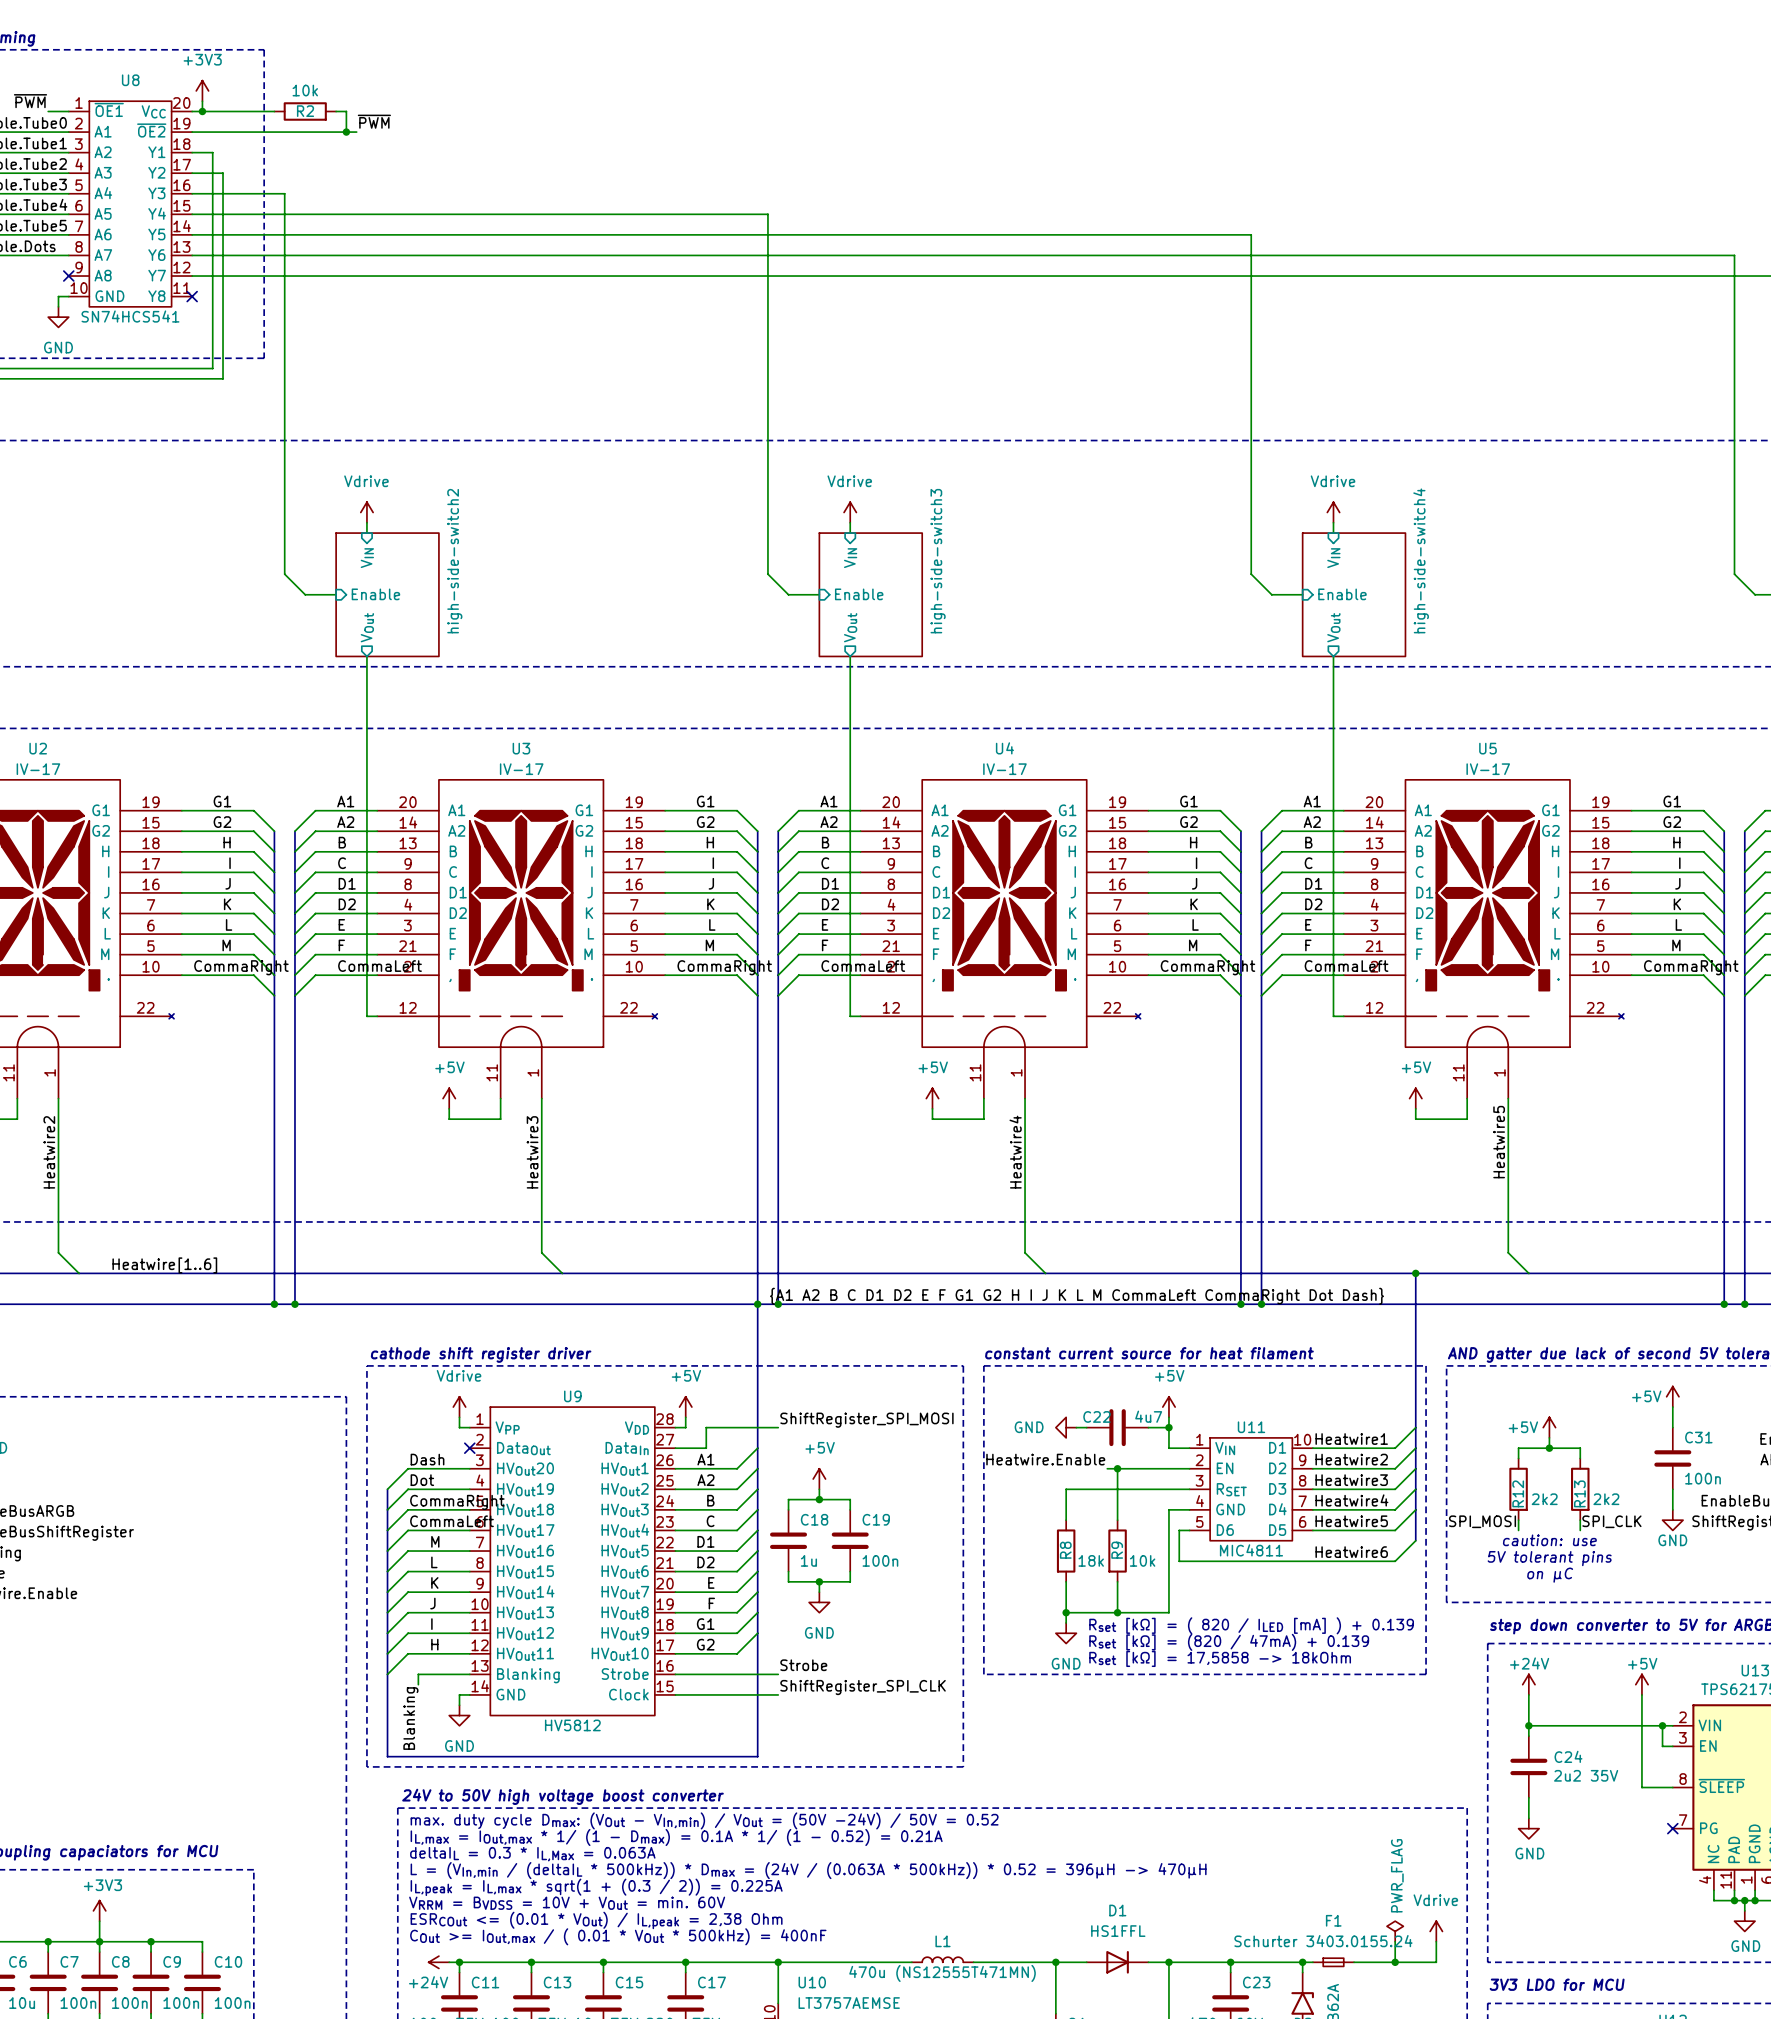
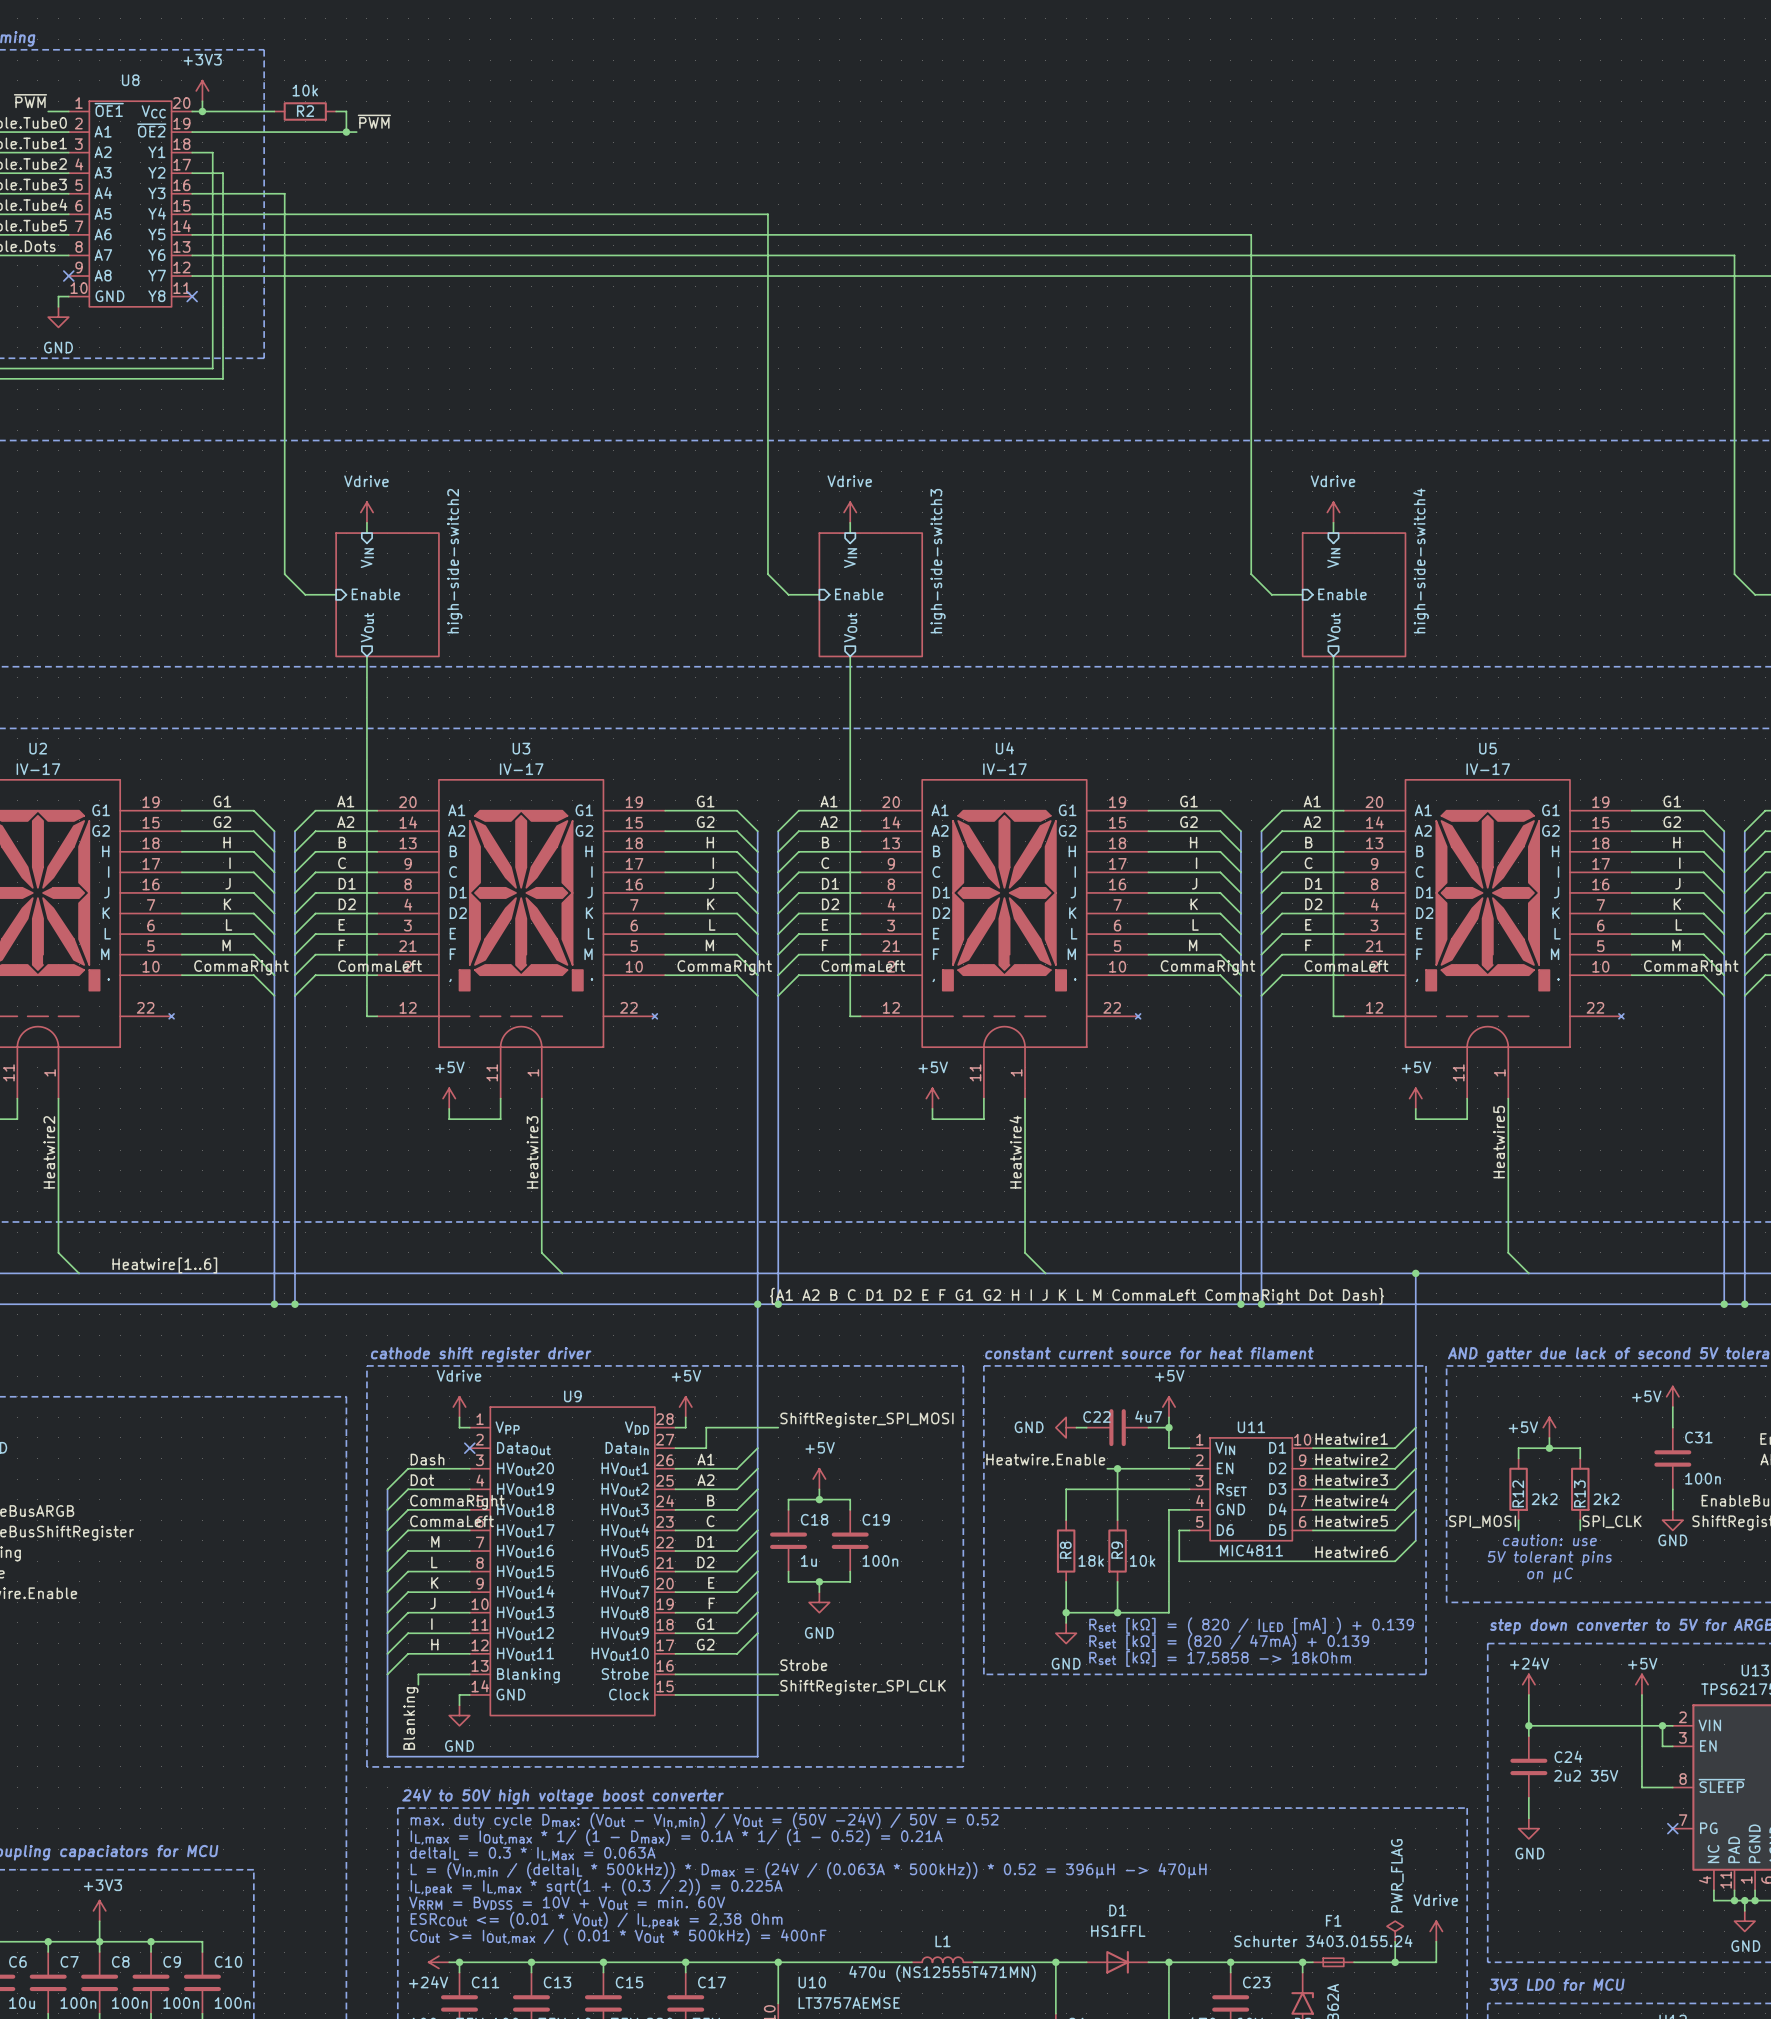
U8 value: SN74HCS541 (130, 316) -> none
U9 value: HV5812 (572, 1725) -> none

